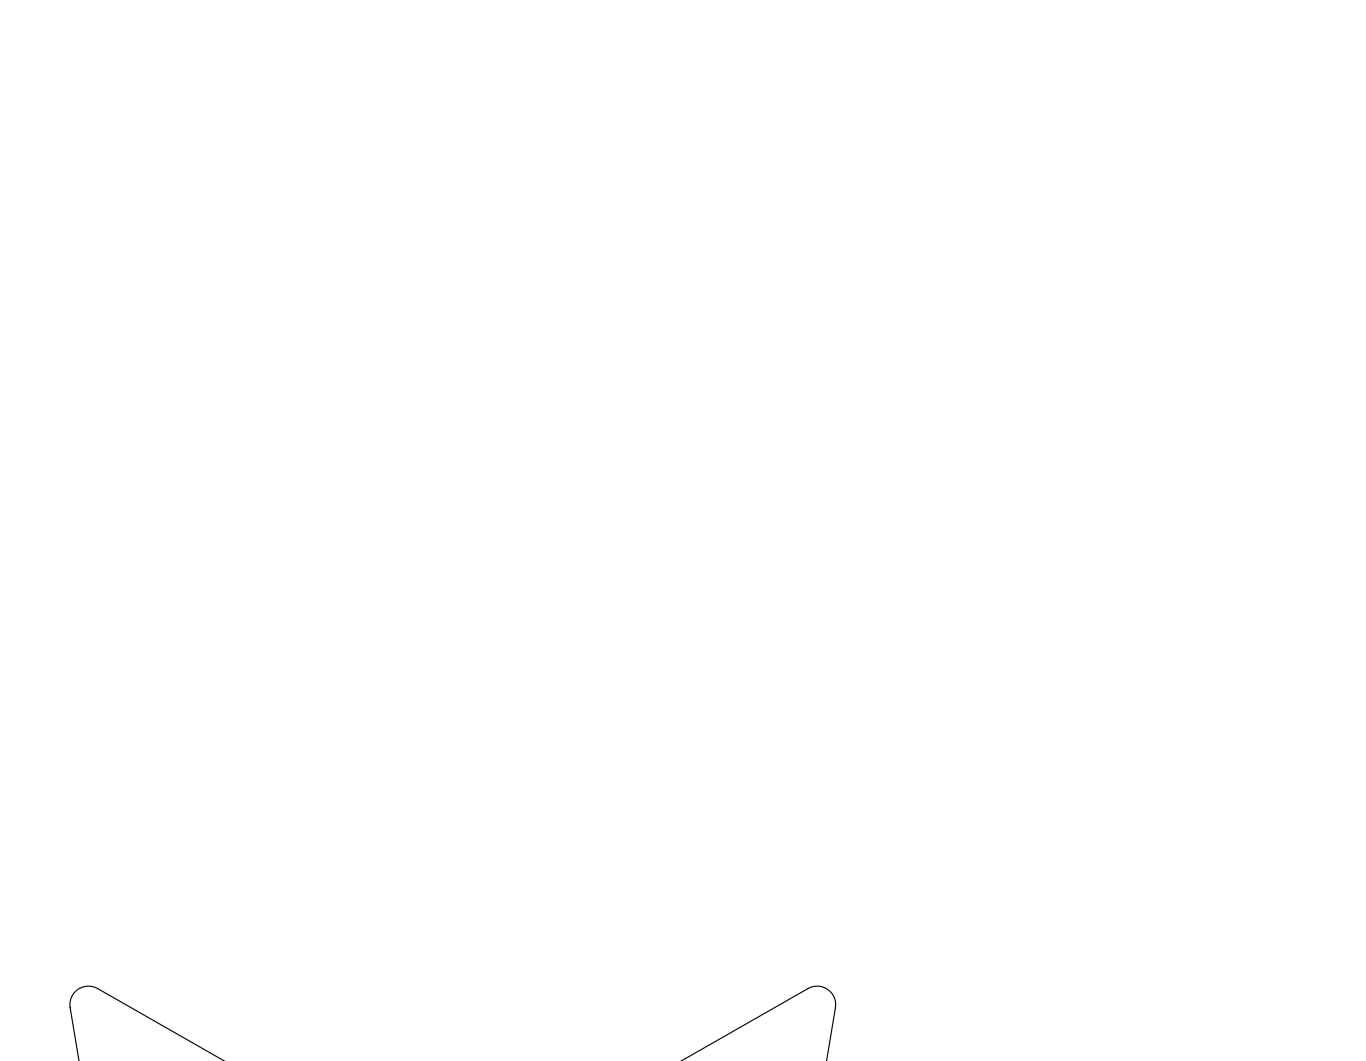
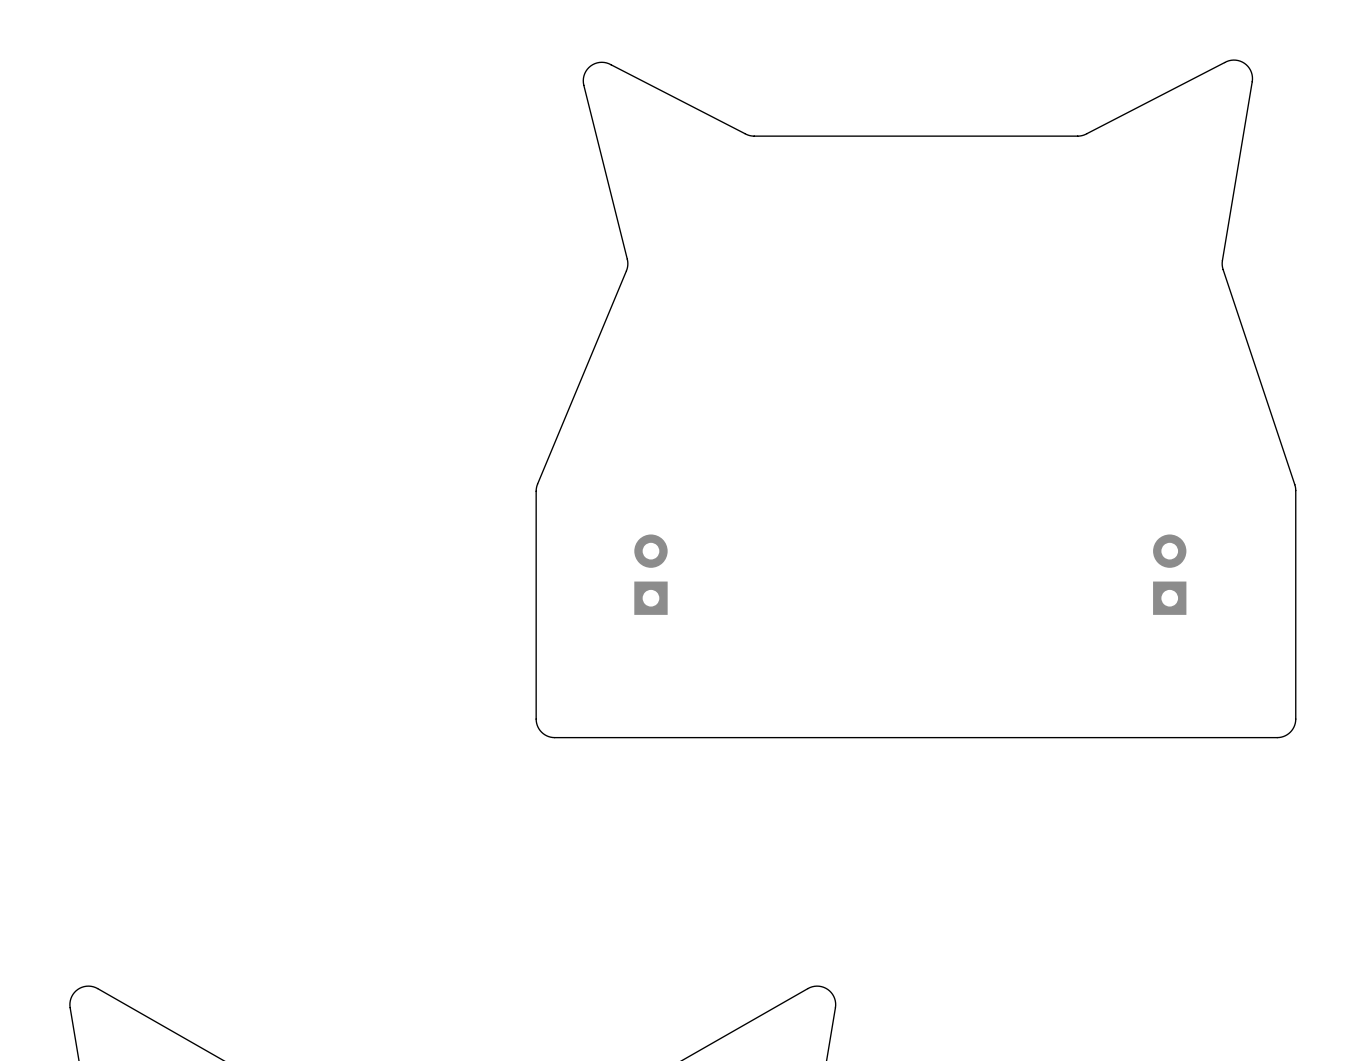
board edge: none -> (1224, 62) (1085, 134) (1077, 136) (750, 135) (608, 63) (597, 62) (588, 67) (583, 75) (583, 85) (627, 265) (536, 487) (536, 719) (541, 732) (554, 737) (1277, 737) (1290, 732) (1295, 719) (1295, 489) (1222, 267) (1252, 79) (1250, 70) (1242, 62) (1233, 60) (1224, 62)
part: none -> (650, 574)
part: none -> (1169, 574)

